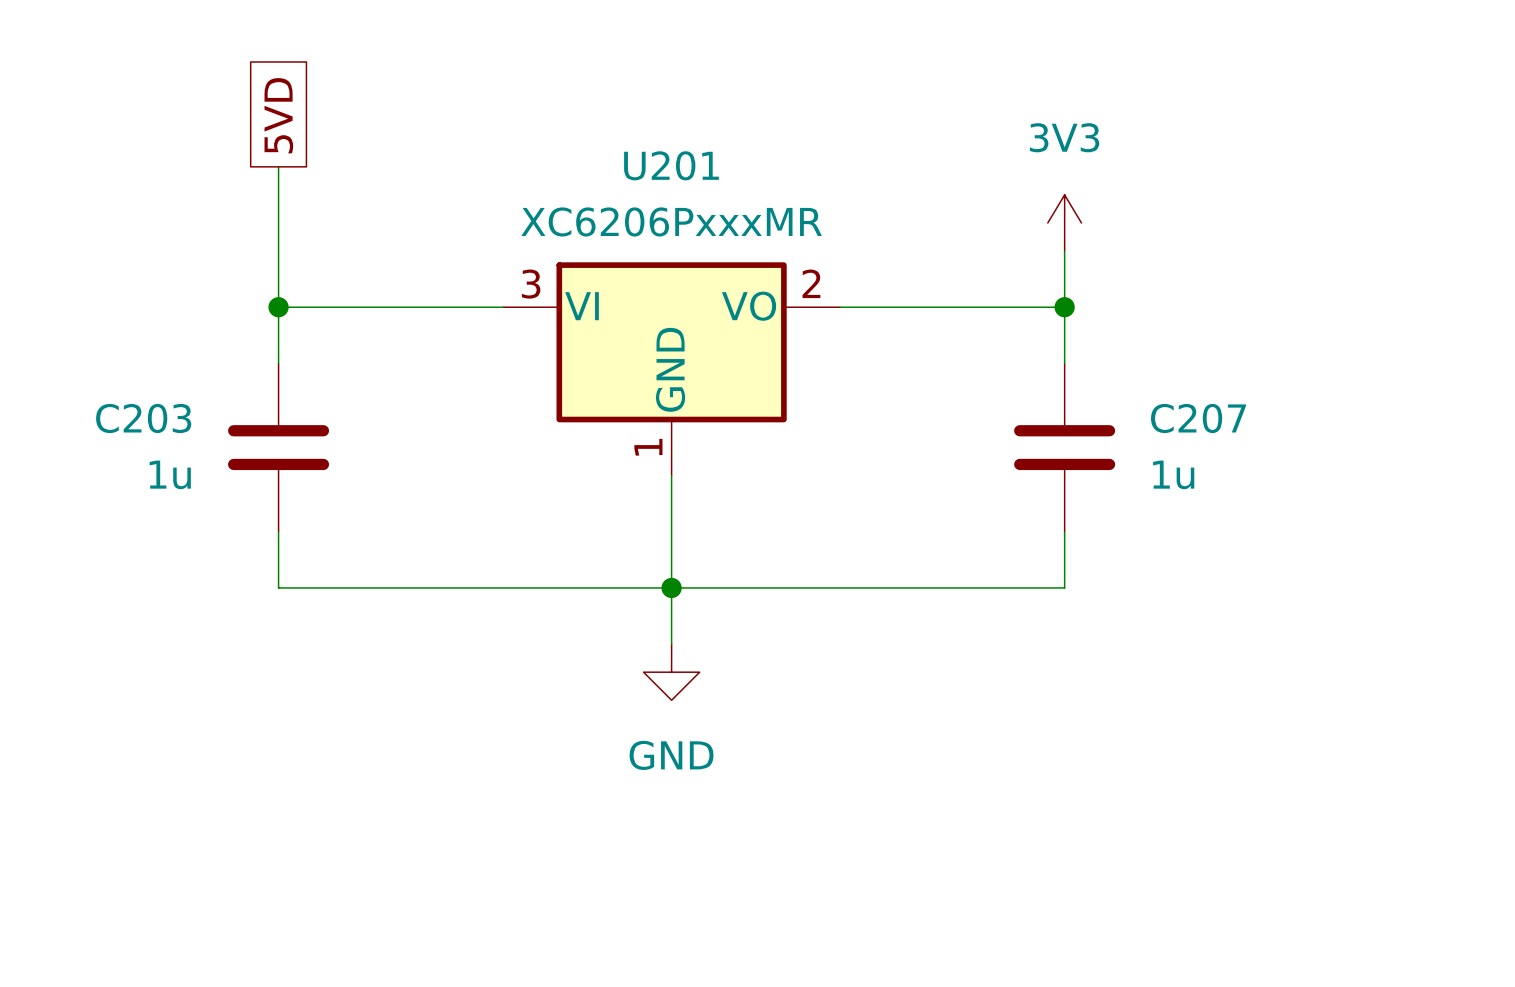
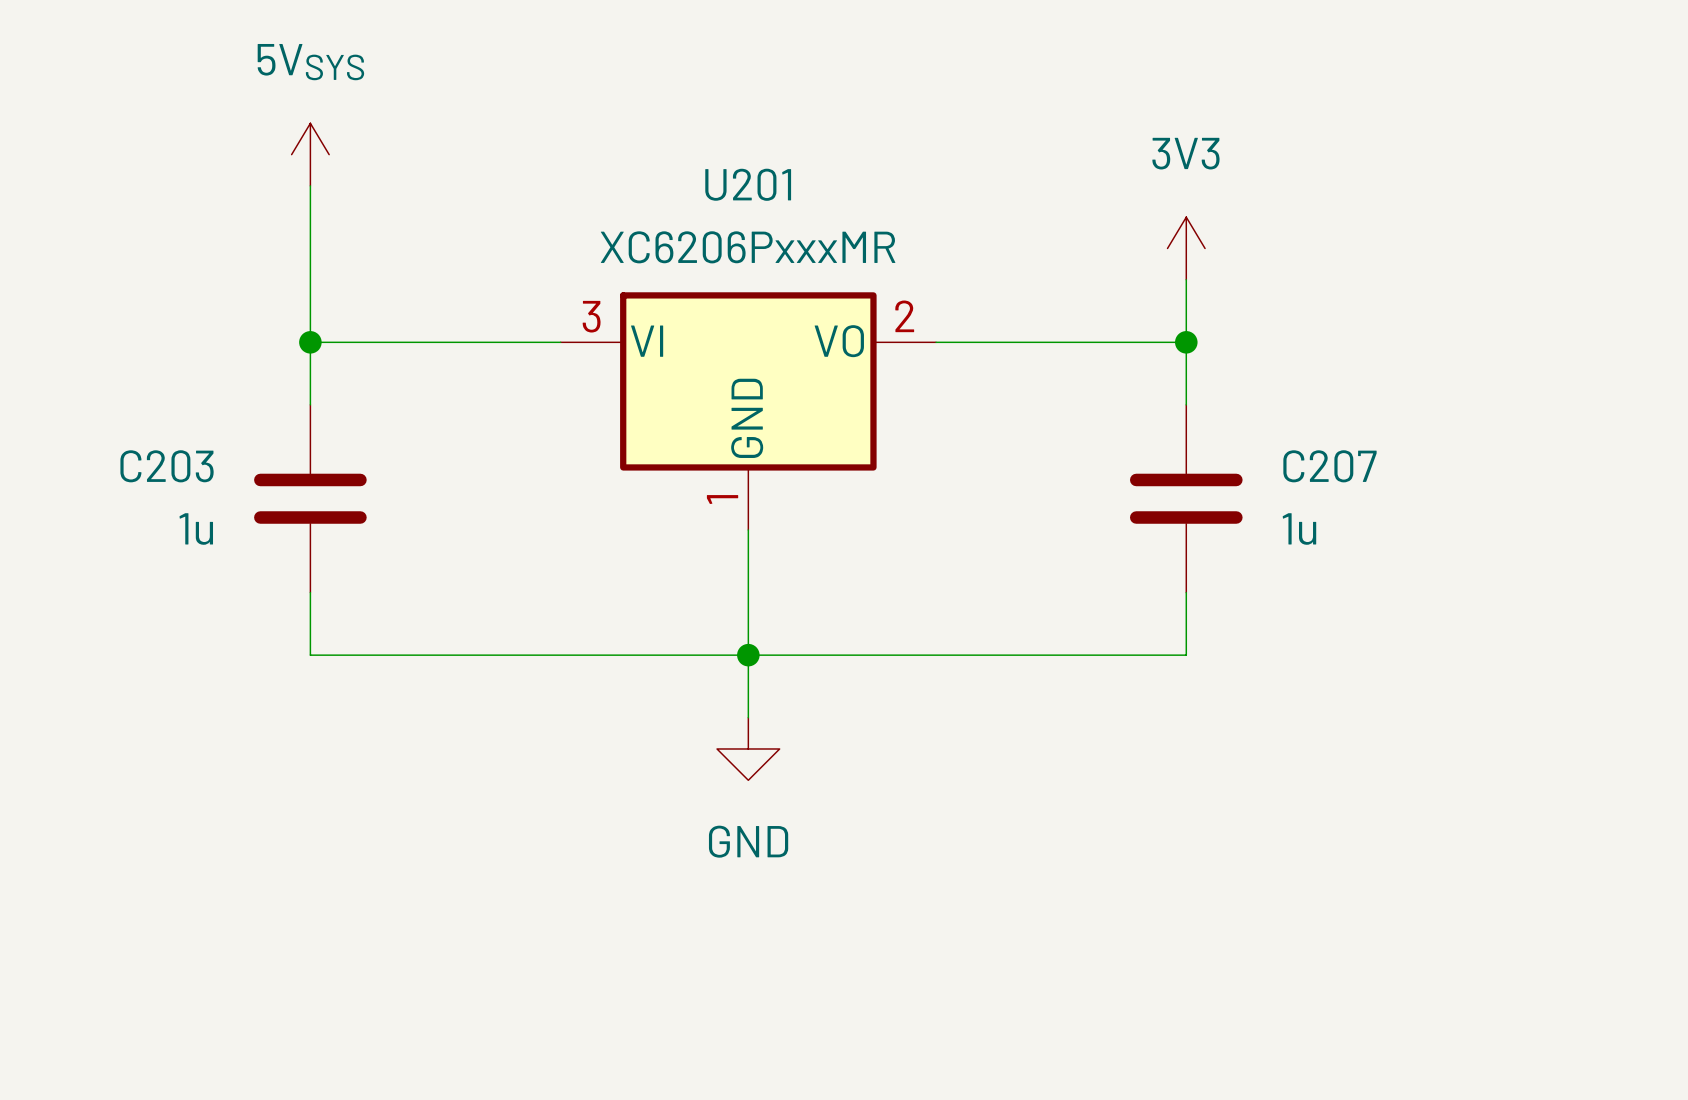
global label: 5VD (278, 115) -> none
power symbol: none -> 5VSYS (310, 154)

